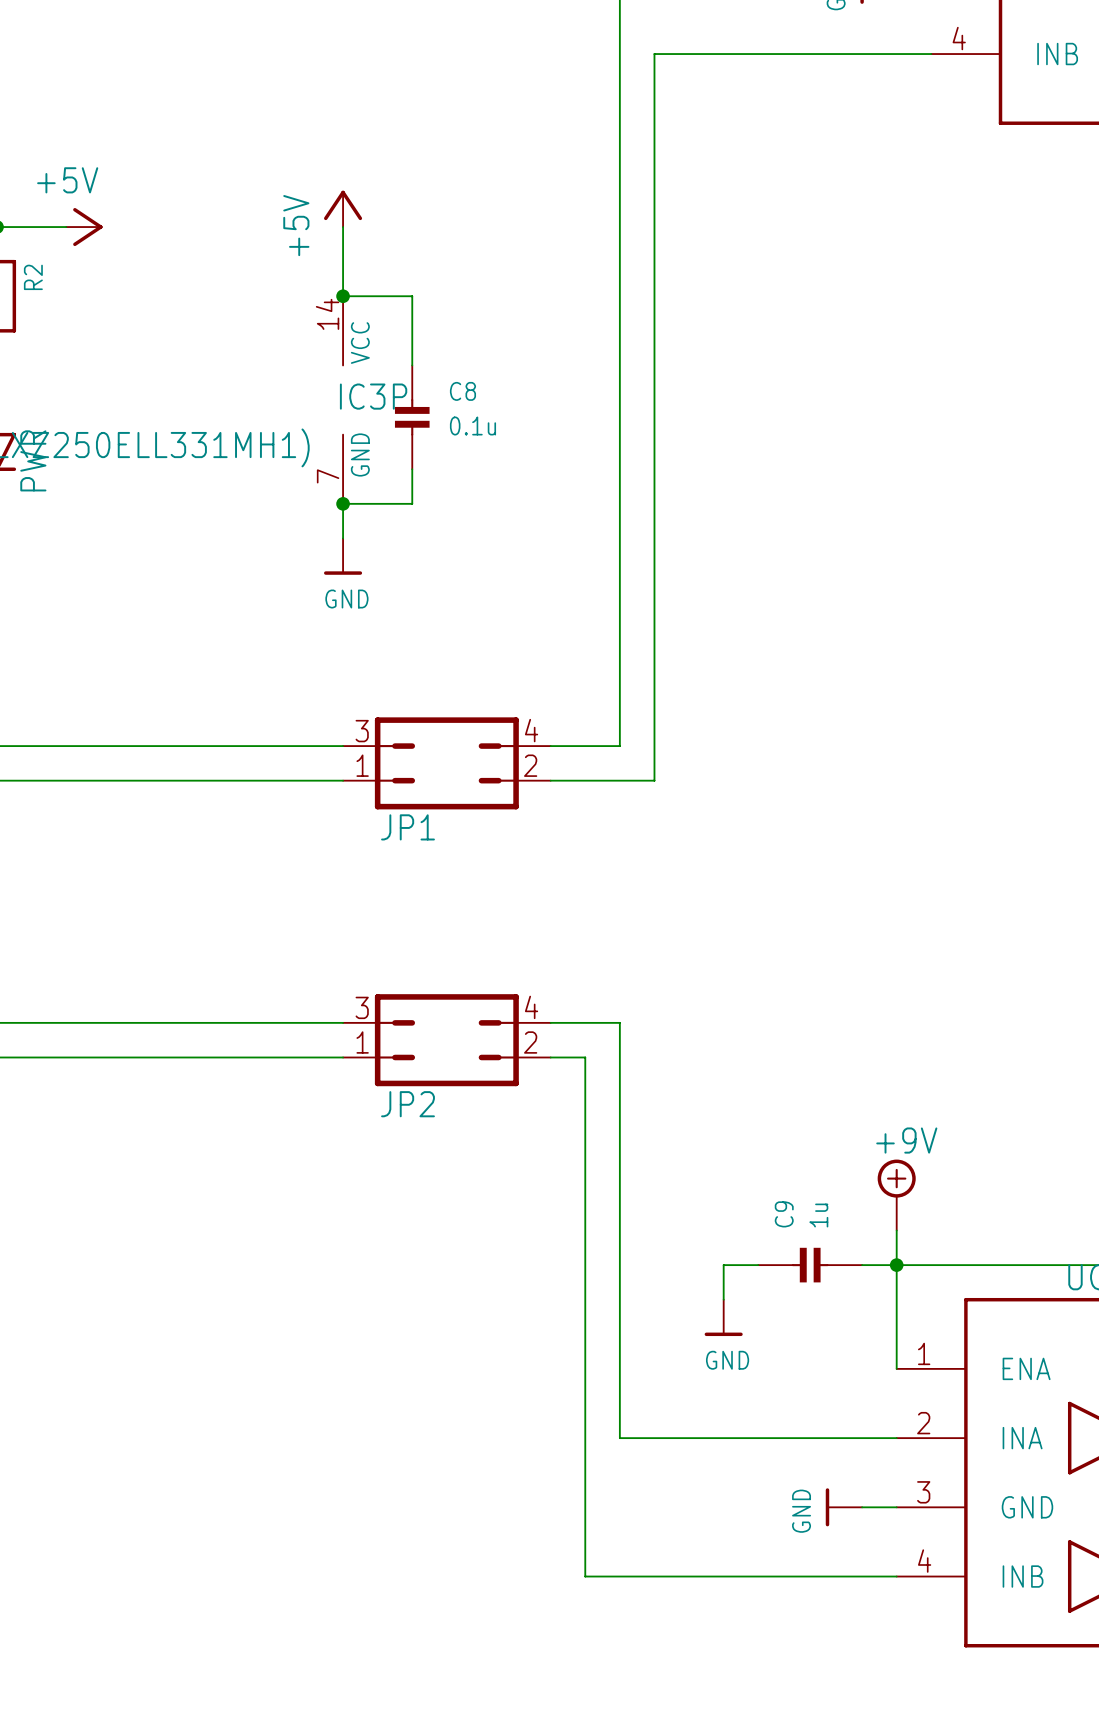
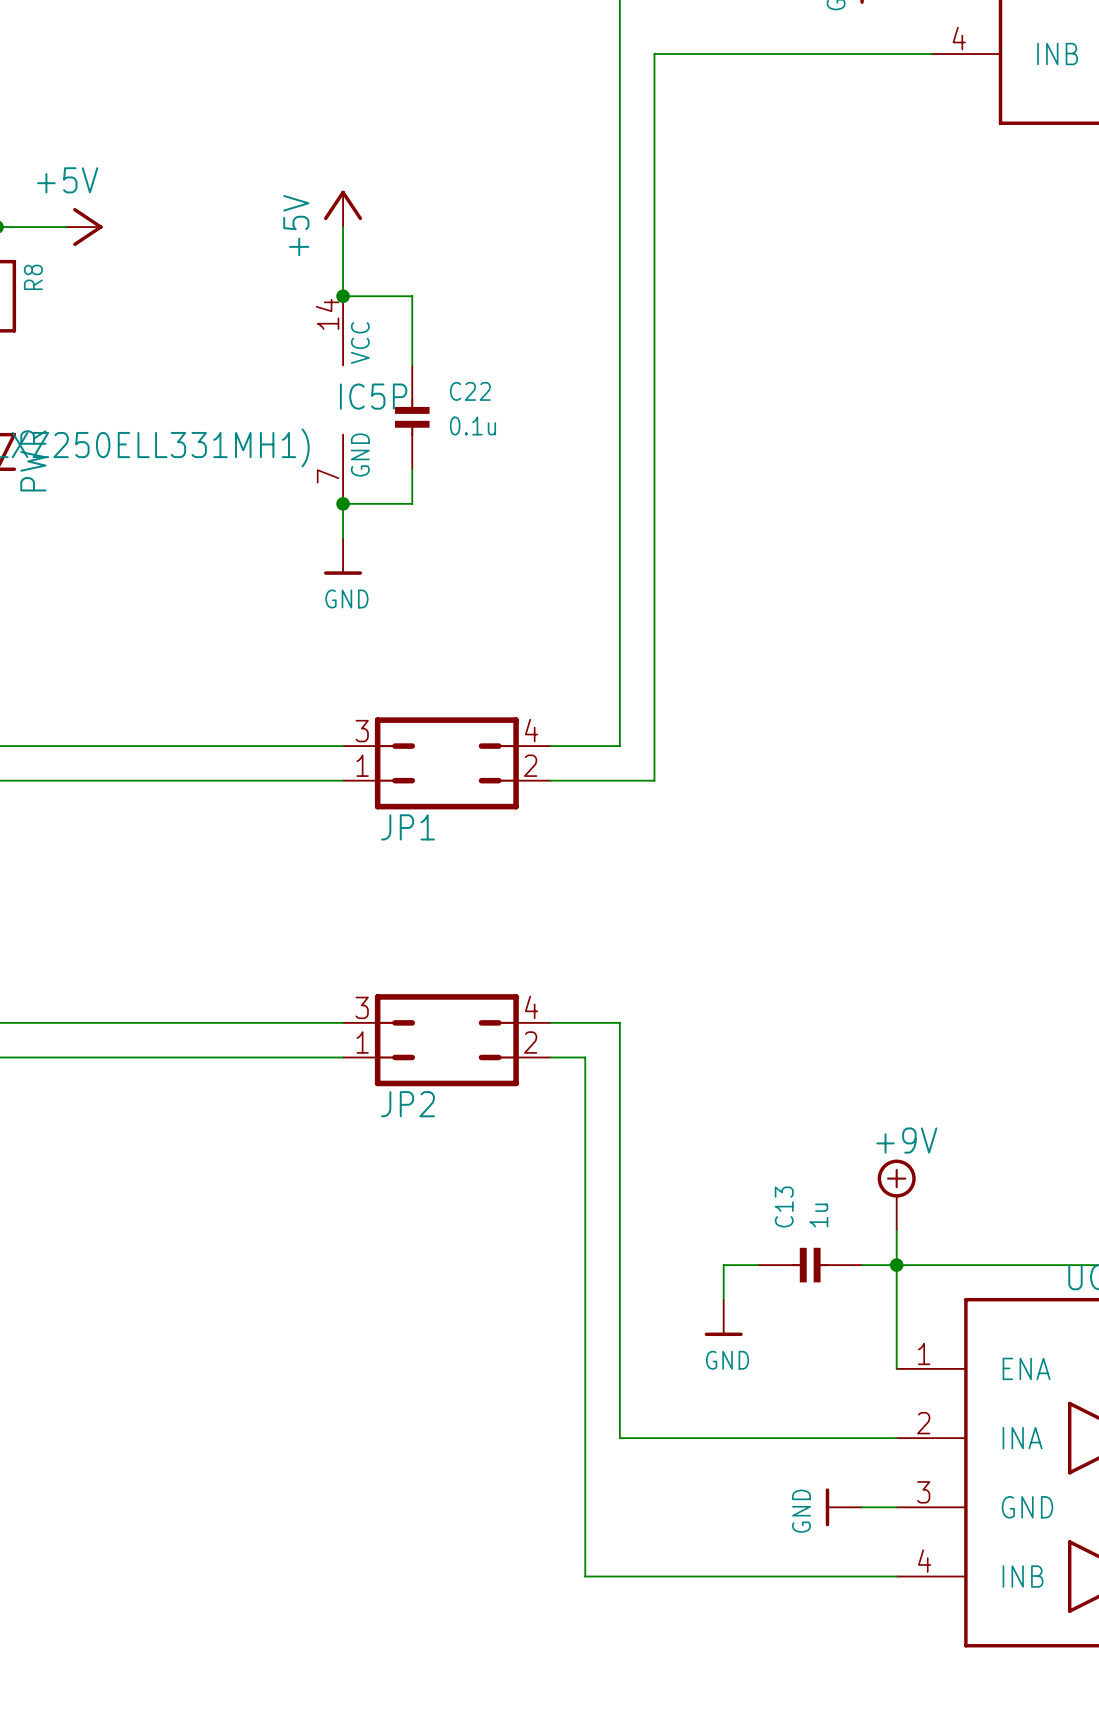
R2 name: R2 (33, 277) -> R8 (33, 277)
C8 name: C8 (462, 391) -> C22 (470, 391)
IC3P name: IC3P (373, 396) -> IC5P (373, 396)
C9 name: C9 (784, 1214) -> C13 (784, 1206)

